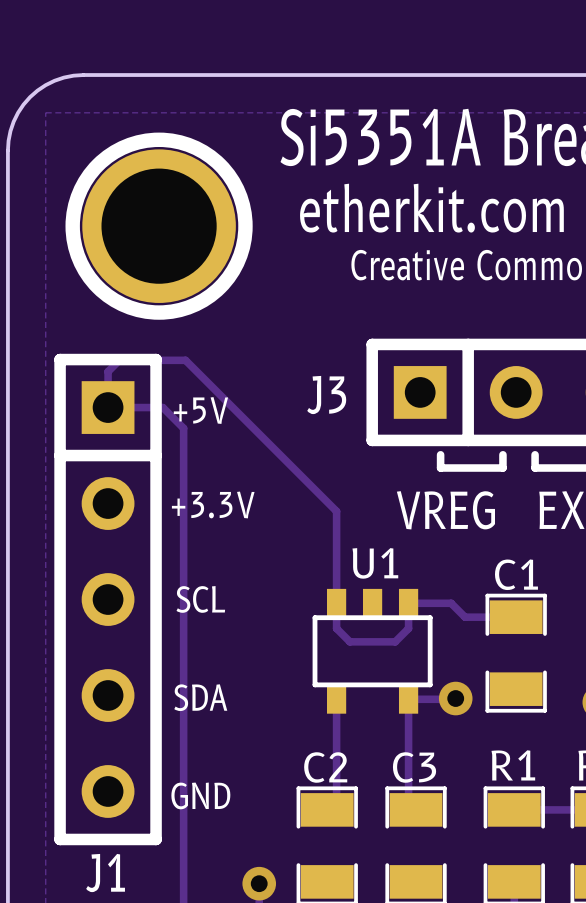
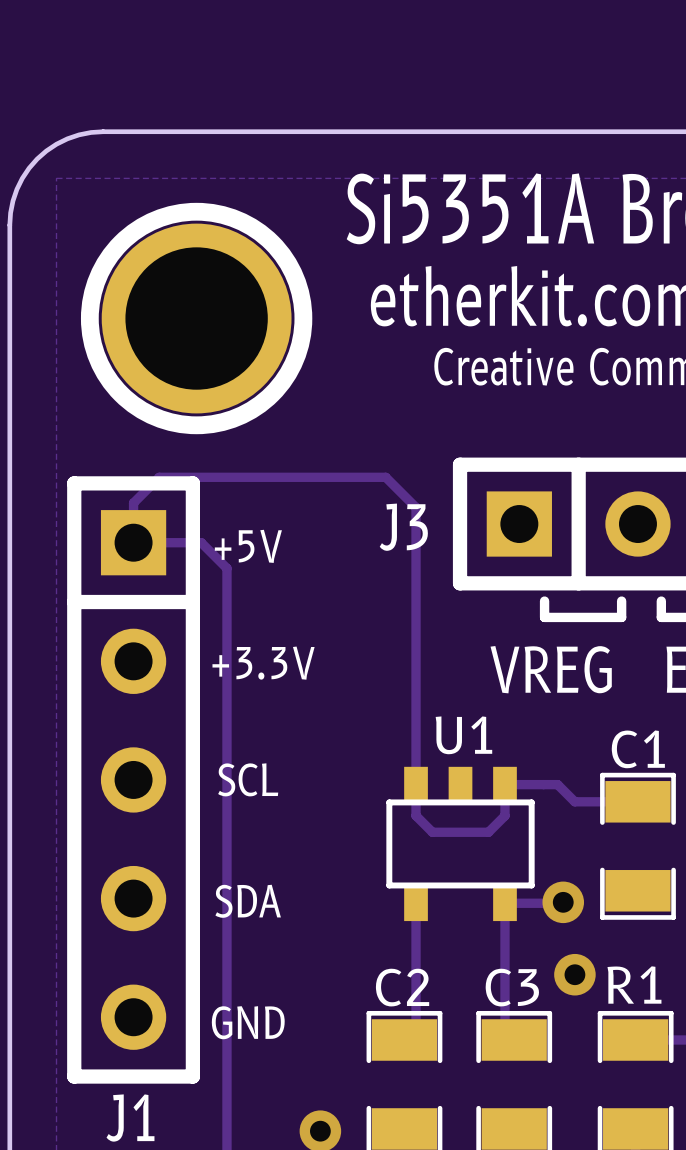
track: (108, 375) (108, 371) (119, 360) (185, 360) (336, 511) -> (133, 503) (159, 477) (385, 477) (416, 507) (416, 671)
via: none -> (574, 974)

